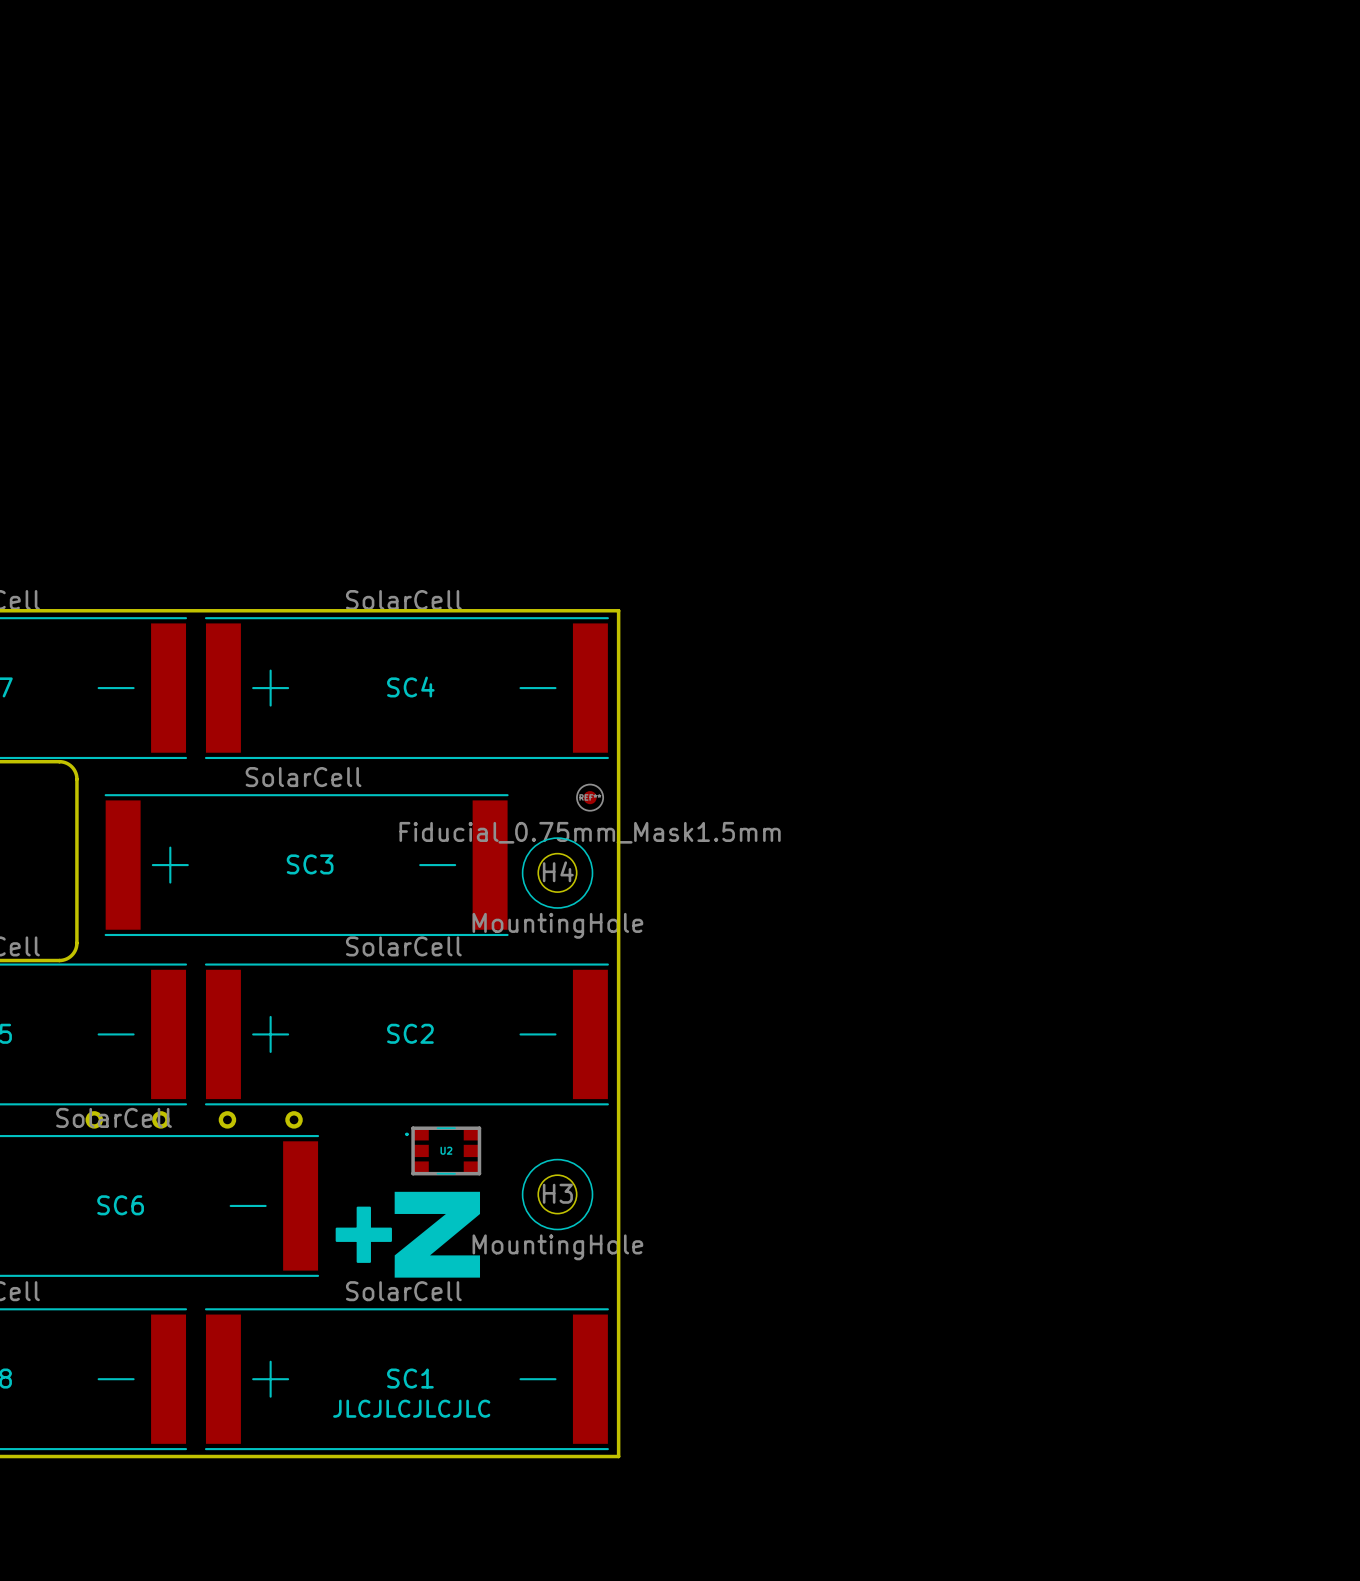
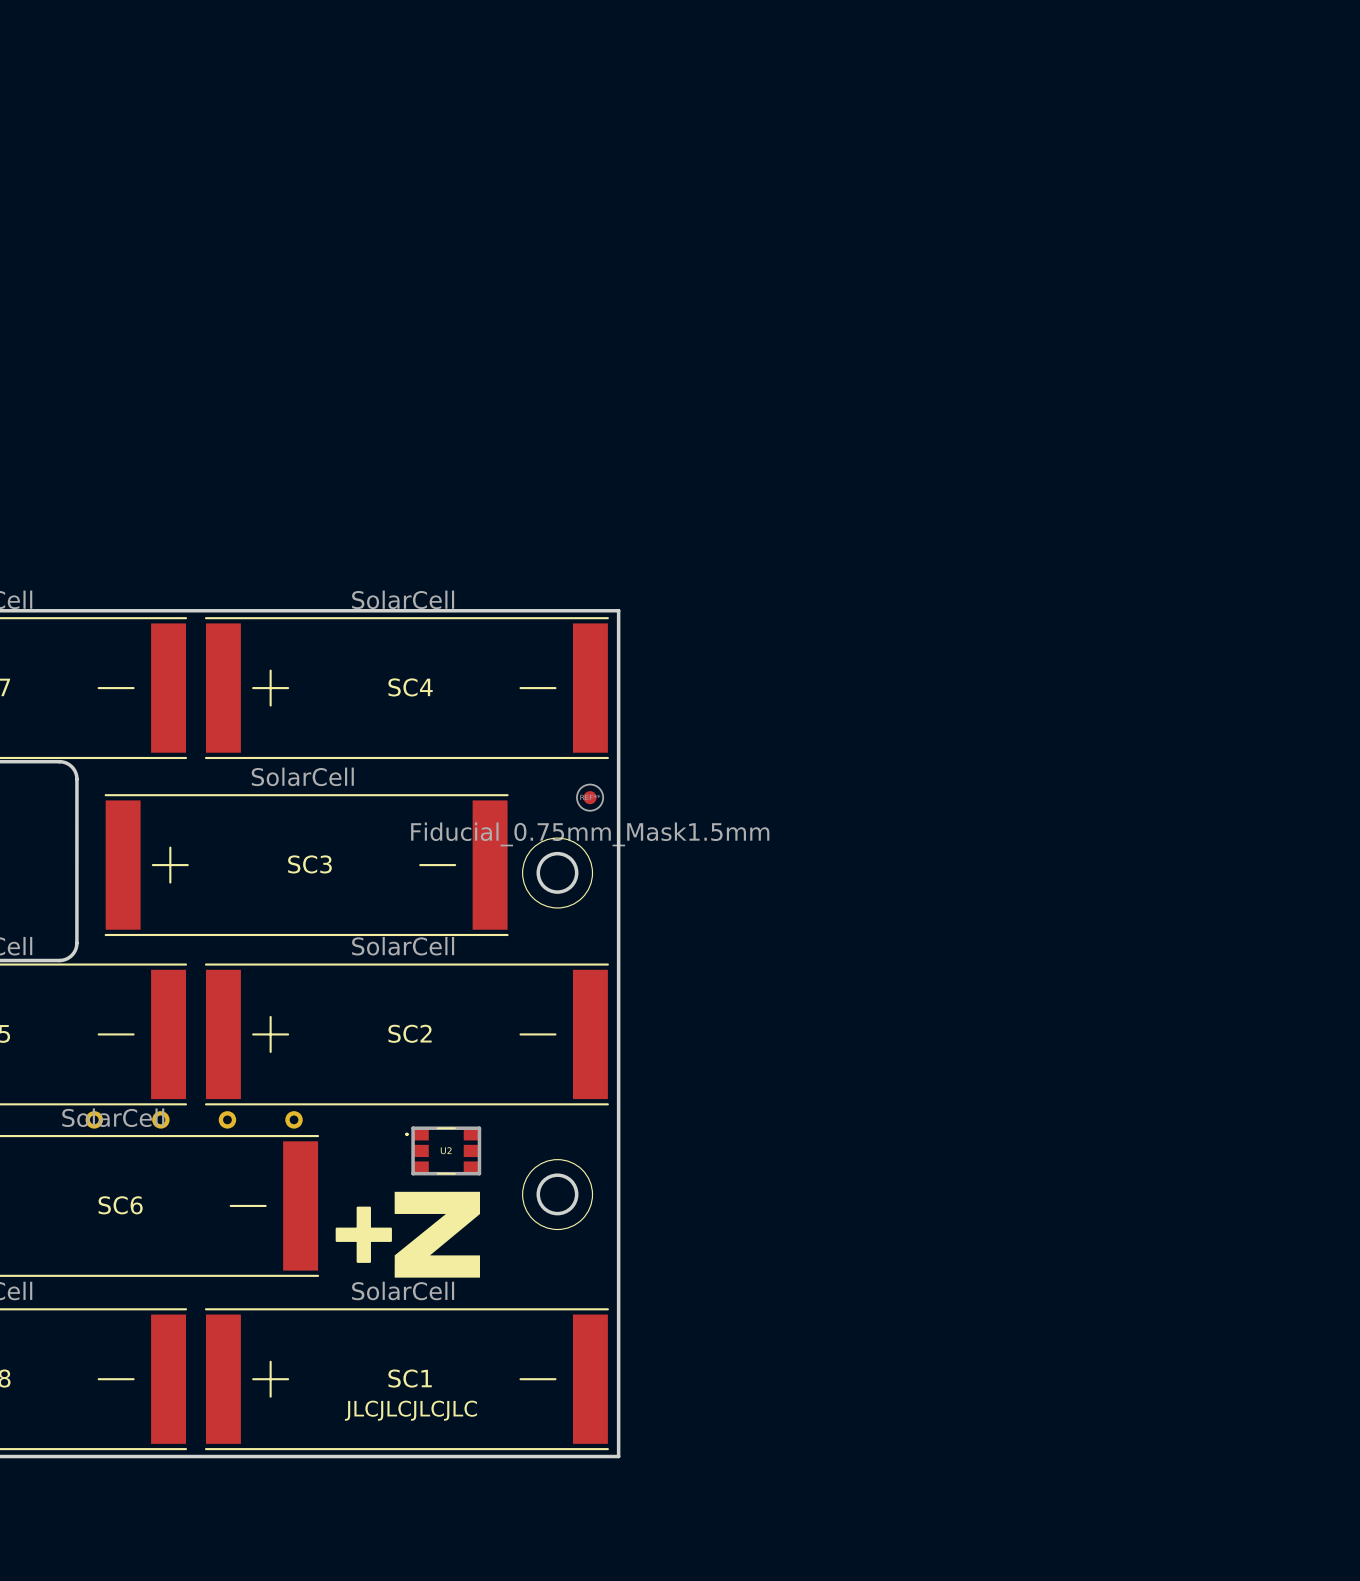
round board edge: none -> [536, 851, 579, 894]
H4: MountingHole (557, 872) -> none
round board edge: none -> [536, 1173, 579, 1216]
H3: MountingHole (557, 1194) -> none

